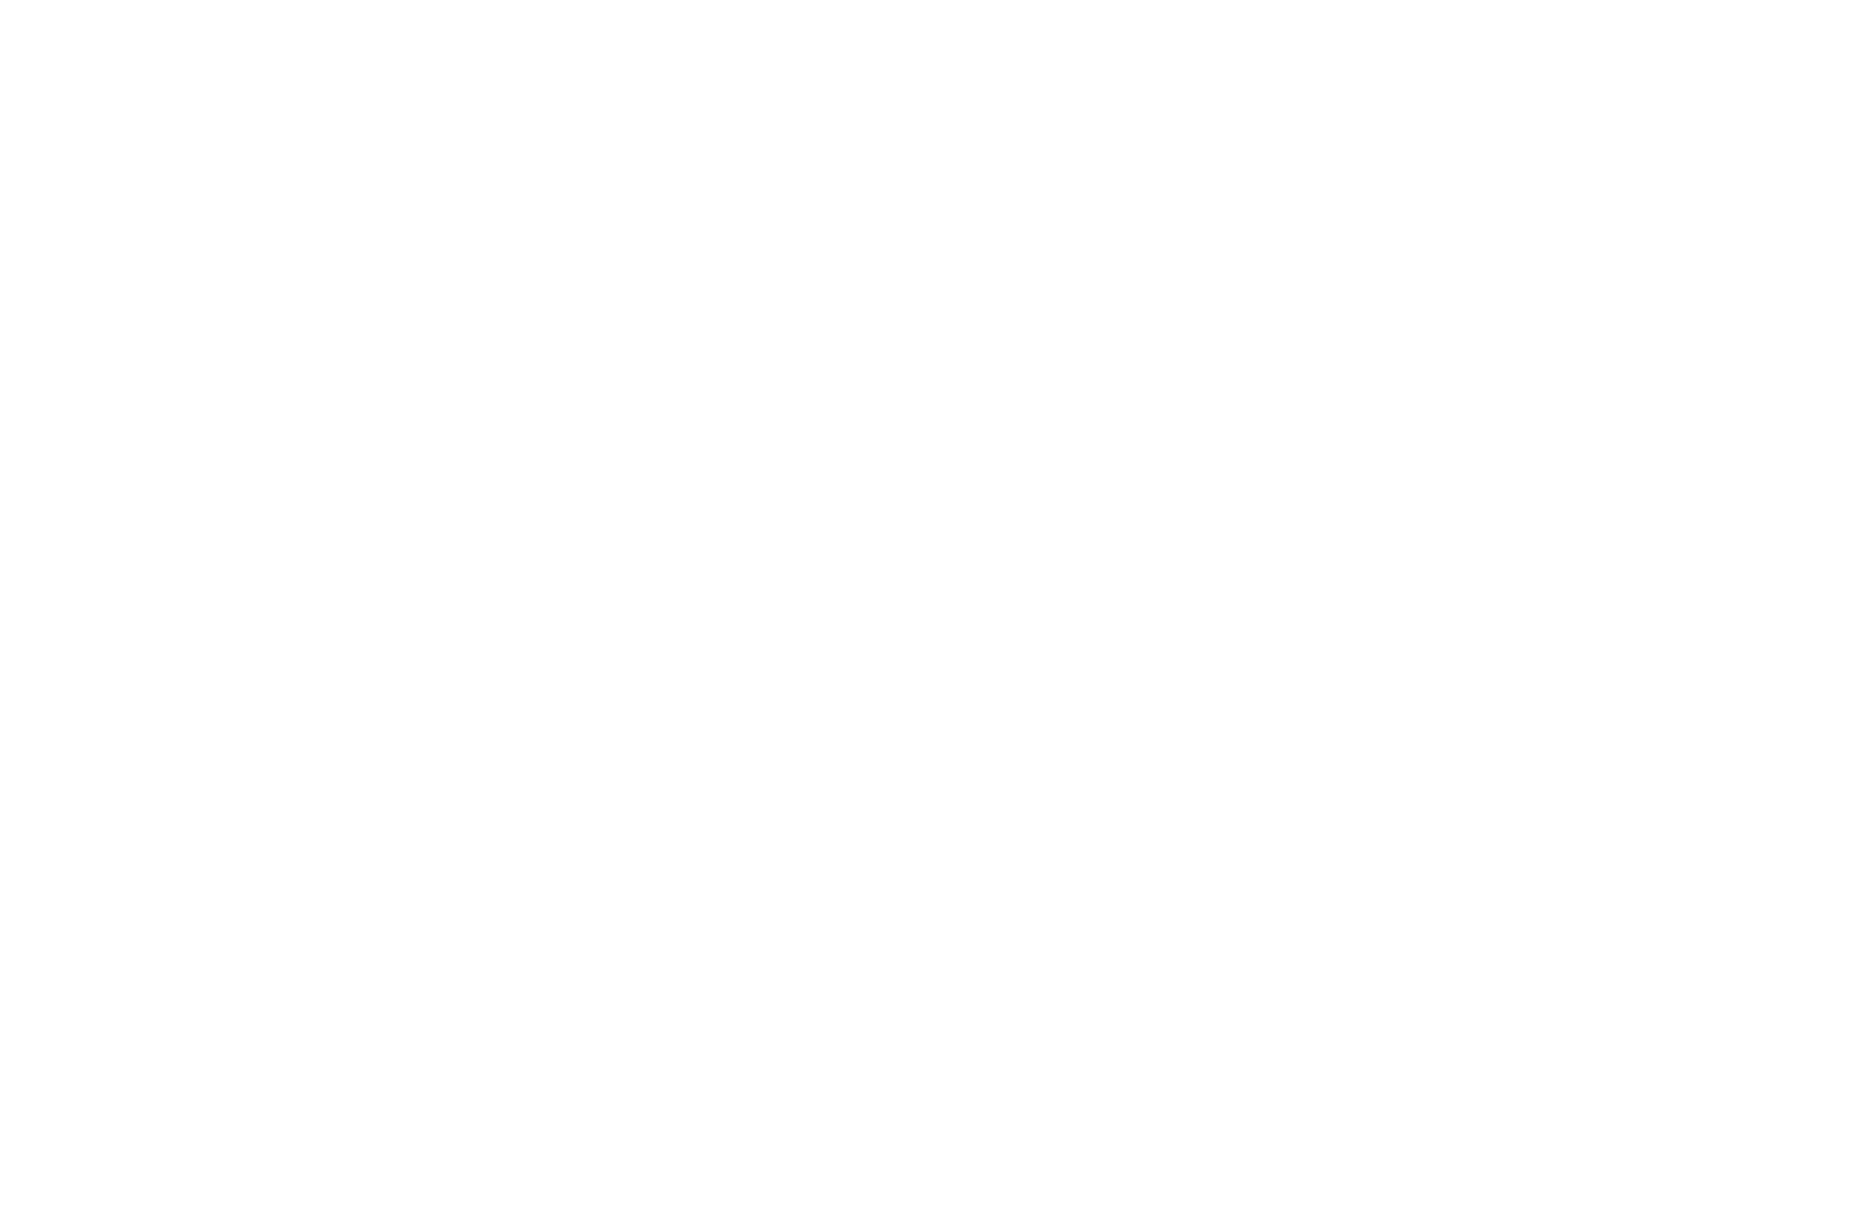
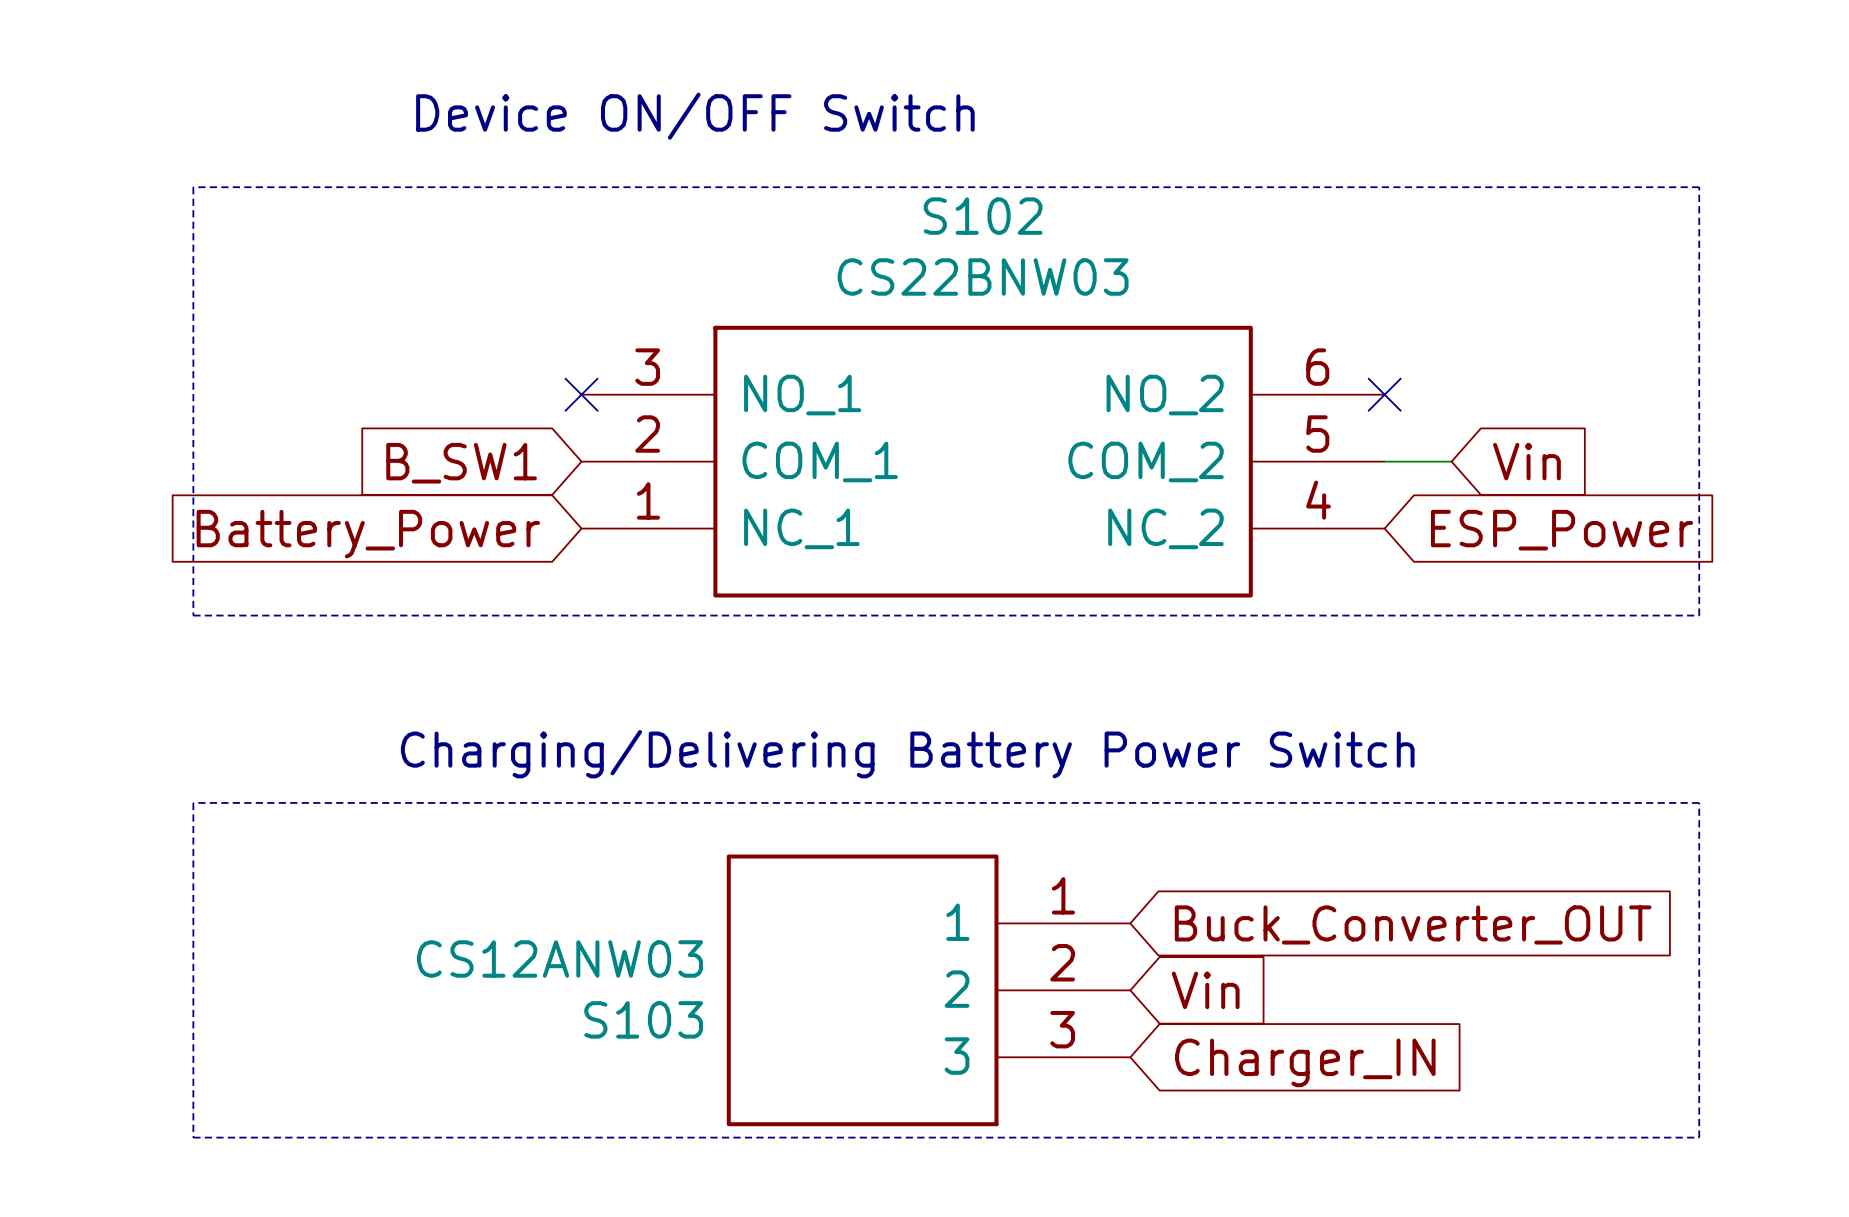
text: none -> Device ON/OFF Switch (695, 116)
line: none -> (193, 187) (1699, 187) (1699, 615) (193, 615) (193, 187)
no-connect mark: none -> (581, 394)
no-connect mark: none -> (1384, 394)
S102: none -> CS22BNW03 (983, 461)
wire: none -> (1384, 461) (1451, 461)
global label: none -> Vin (1526, 461)
global label: none -> B_SW1 (461, 463)
global label: none -> ESP_Power (1562, 530)
global label: none -> Battery_Power (368, 534)
text: none -> Charging/Delivering Battery Power Switch (907, 754)
line: none -> (193, 802) (193, 1137) (1699, 1137) (1699, 802) (193, 802)
global label: none -> Buck_Converter_OUT (1413, 924)
S103: none -> CS12ANW03 (928, 990)
global label: none -> Vin (1205, 990)
global label: none -> Charger_IN (1305, 1062)

